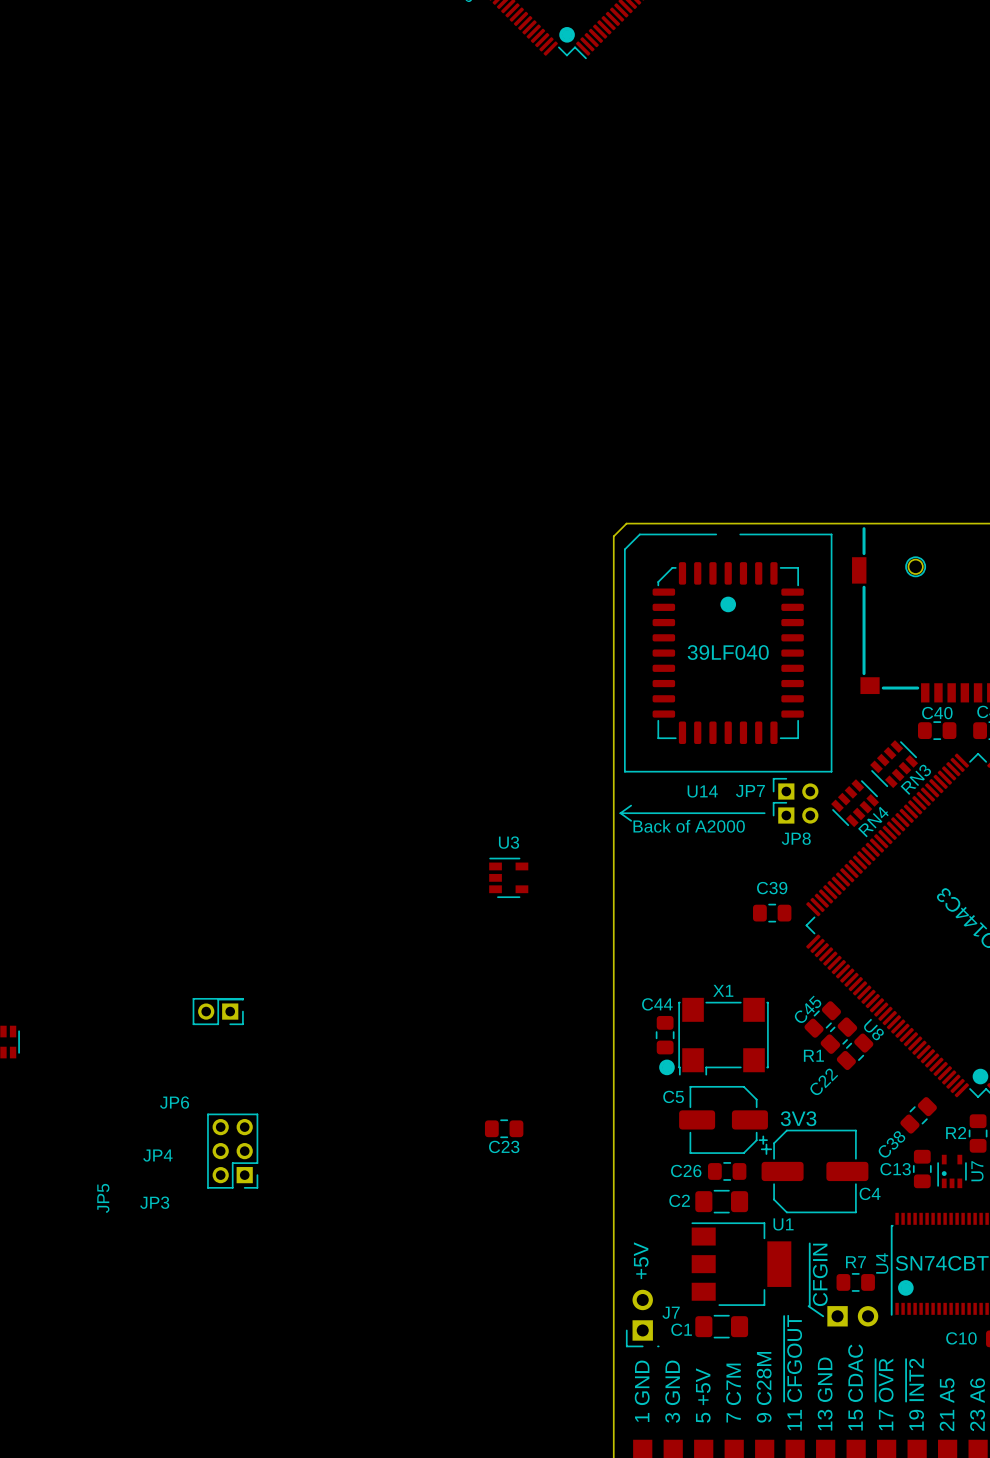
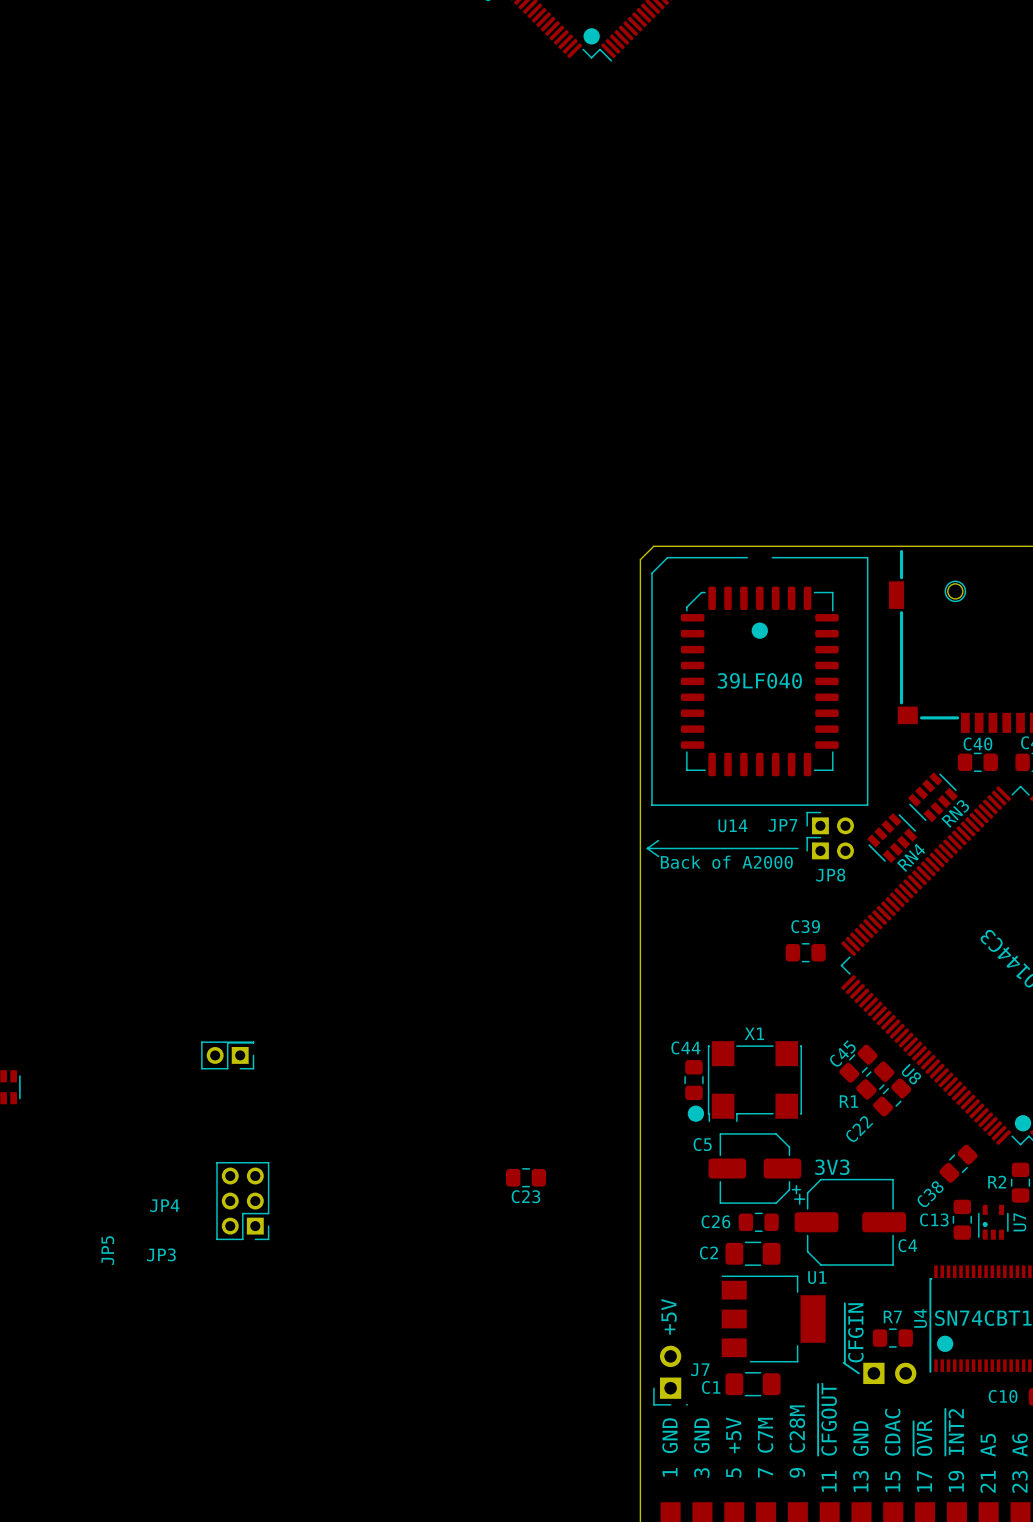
U3: (508, 877) -> none
text: JP6 (174, 1102) -> none

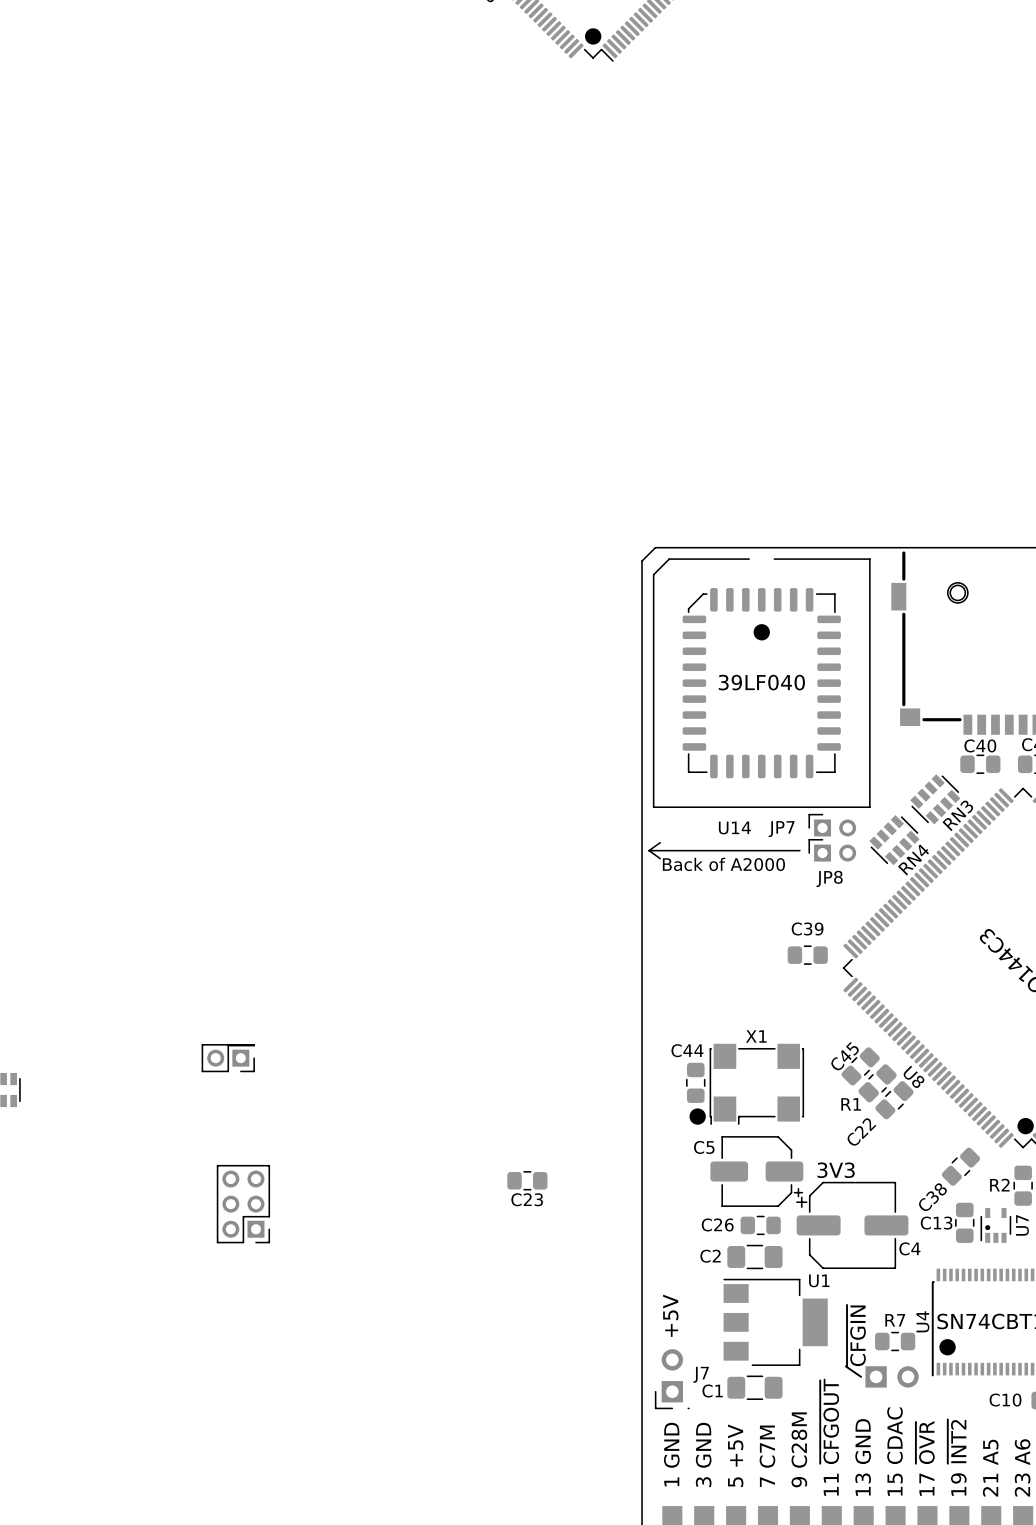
text: JP4 (164, 1205) -> none
text: JP5 (107, 1250) -> none
text: JP3 (161, 1254) -> none

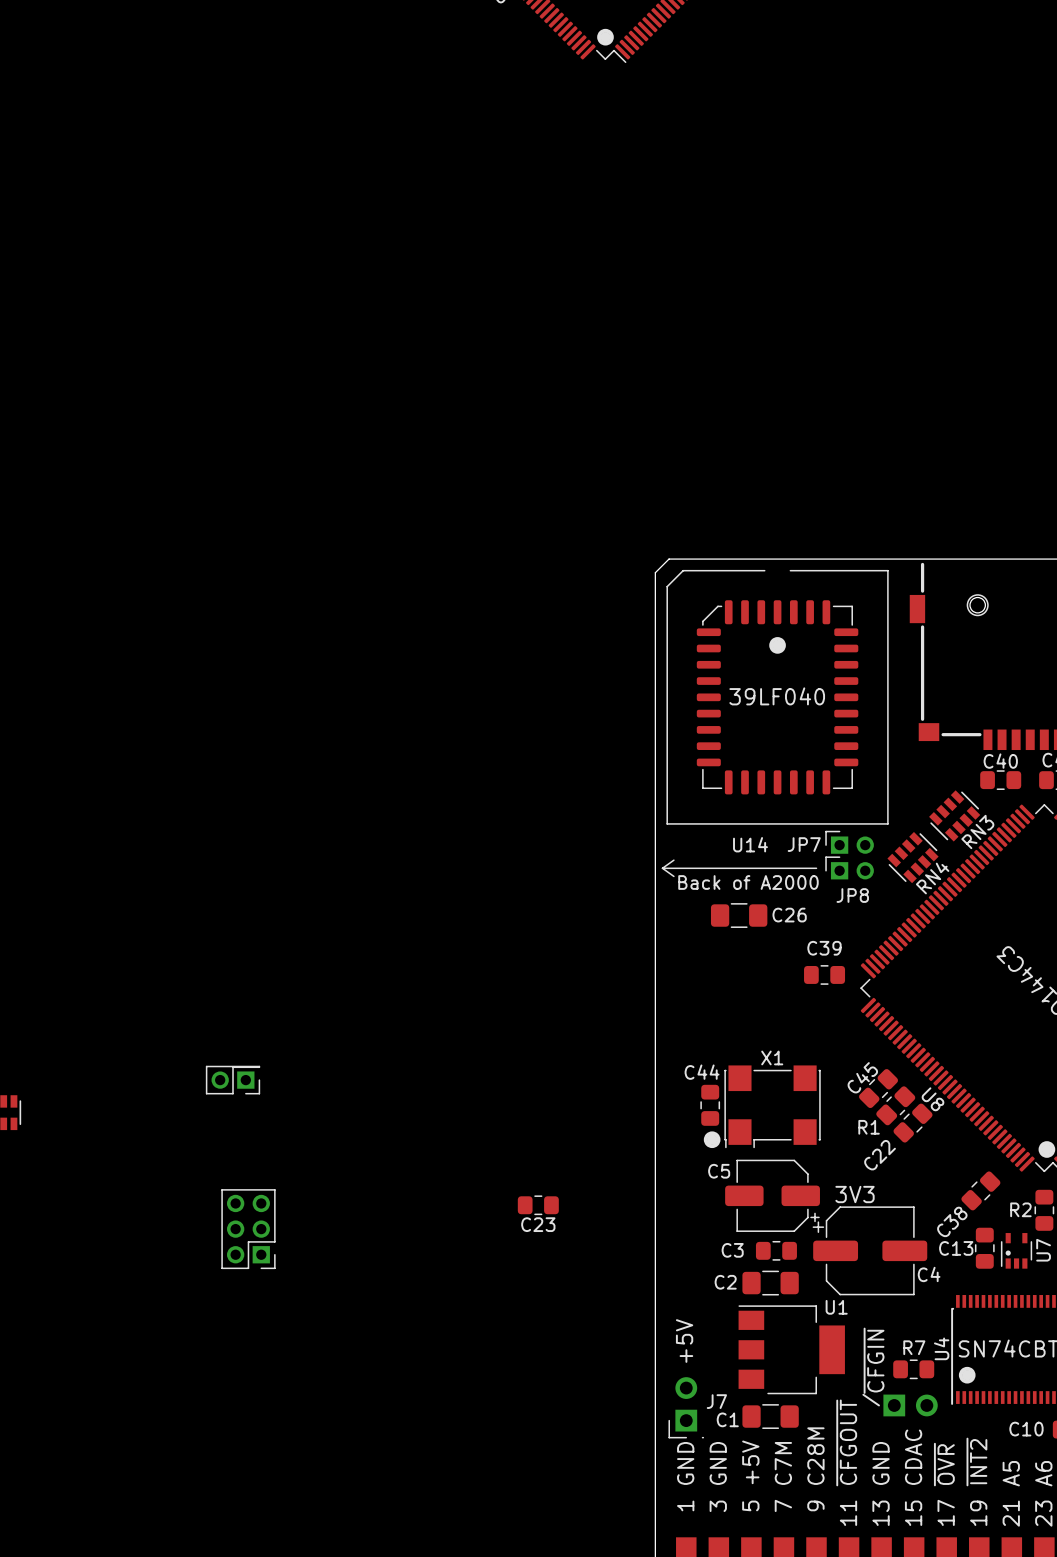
C26: none -> (739, 915)
C26 name: C26 (717, 1224) -> C3 (732, 1250)

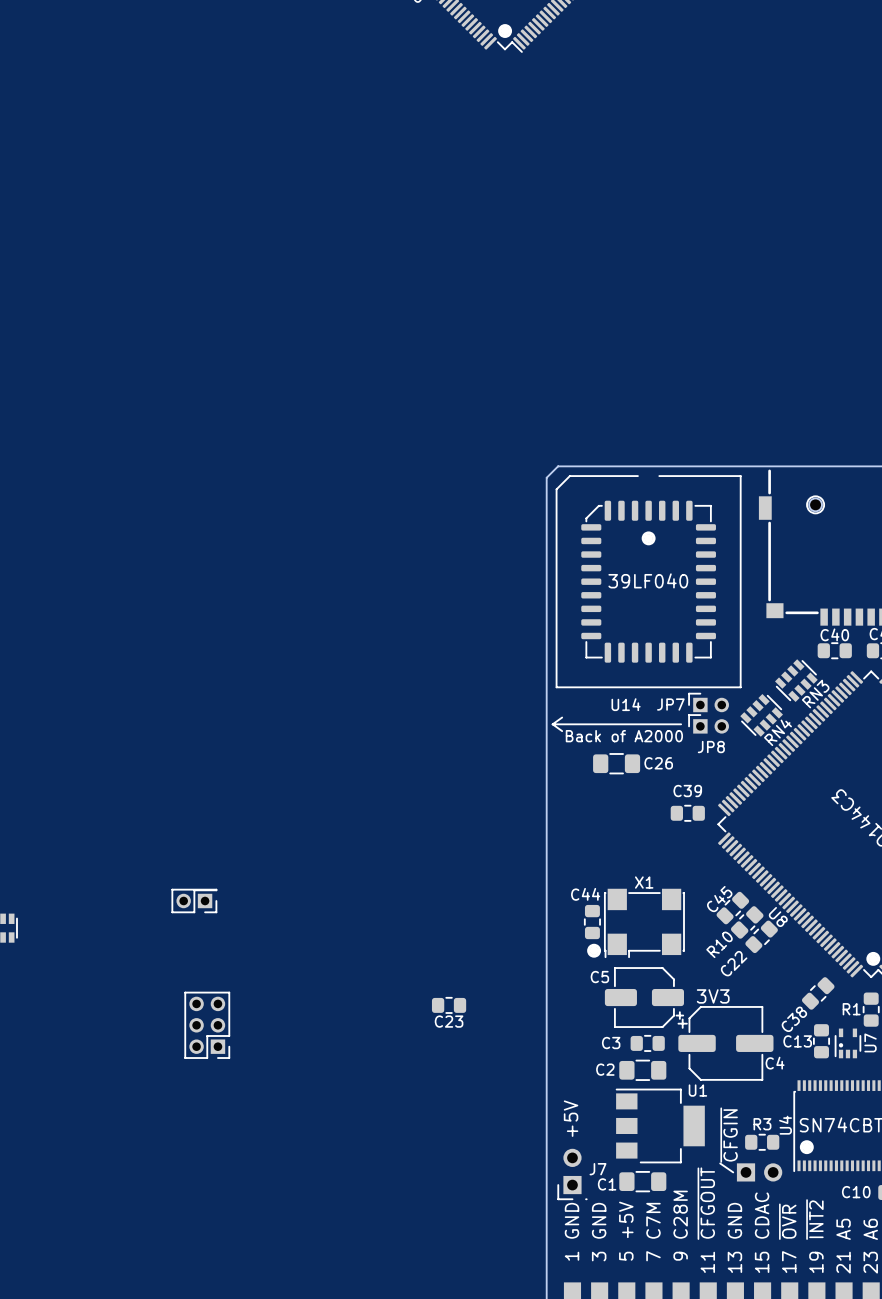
R1 name: R1 (869, 1127) -> R10 (719, 944)
R2 name: R2 (1020, 1209) -> R1 (851, 1009)
R7 name: R7 (914, 1347) -> R3 (762, 1124)

